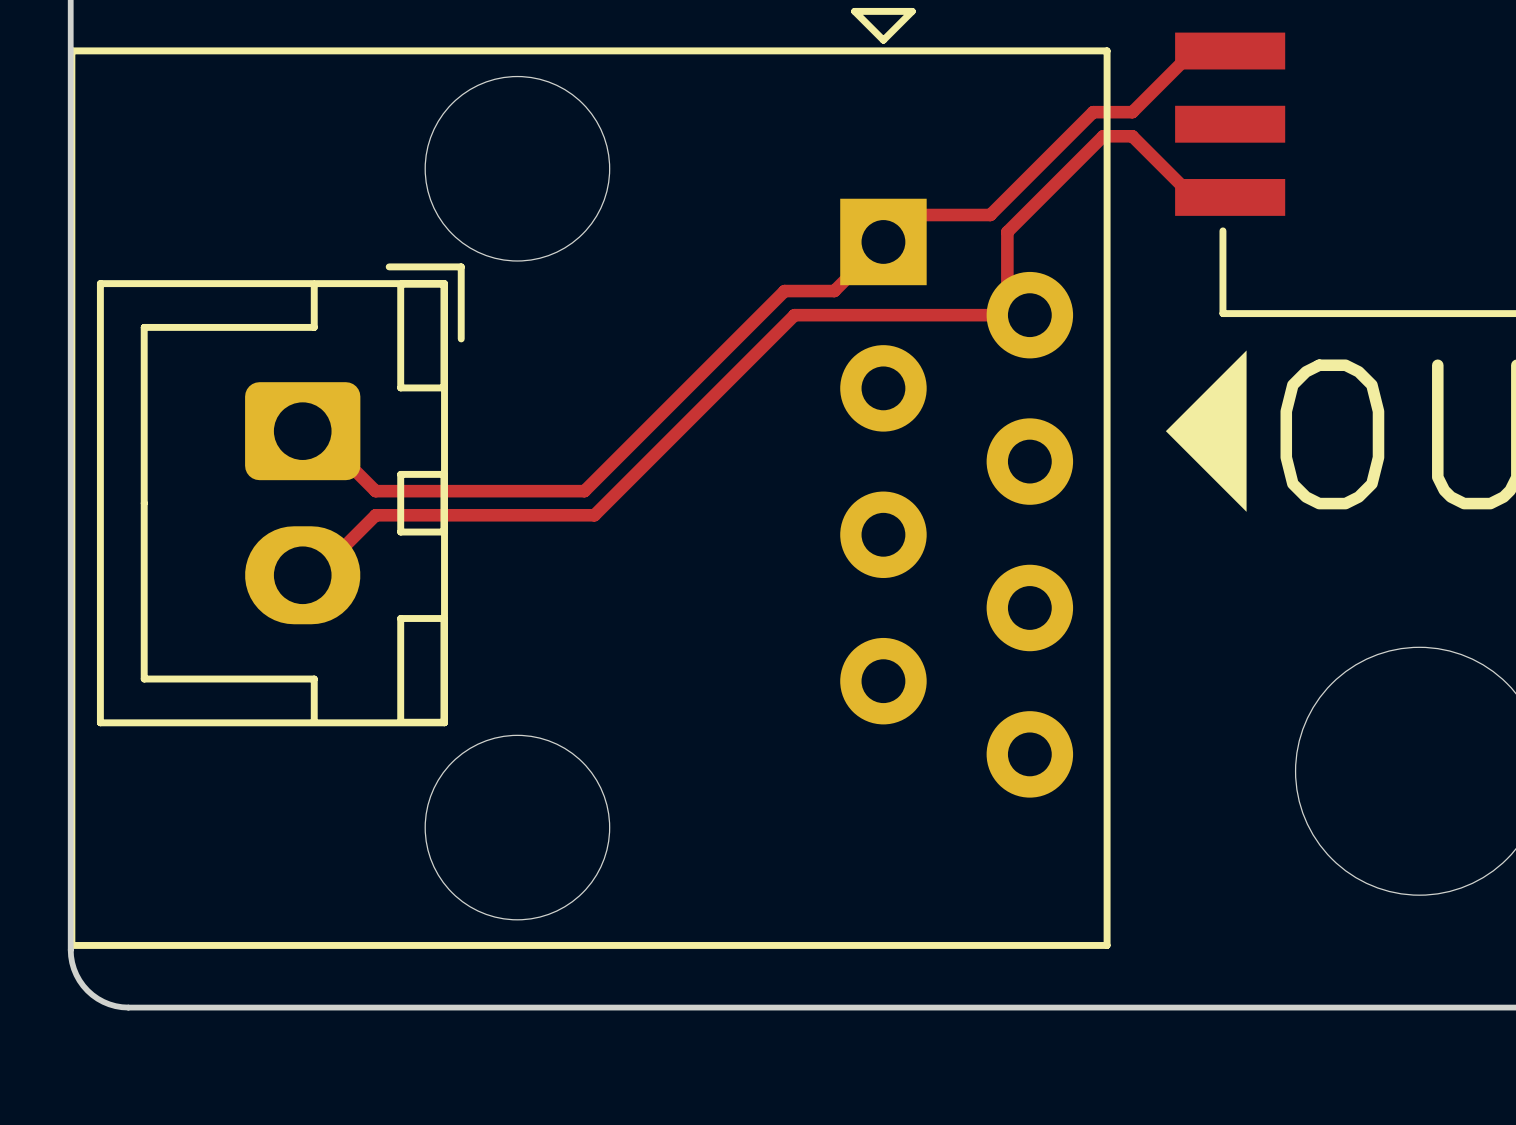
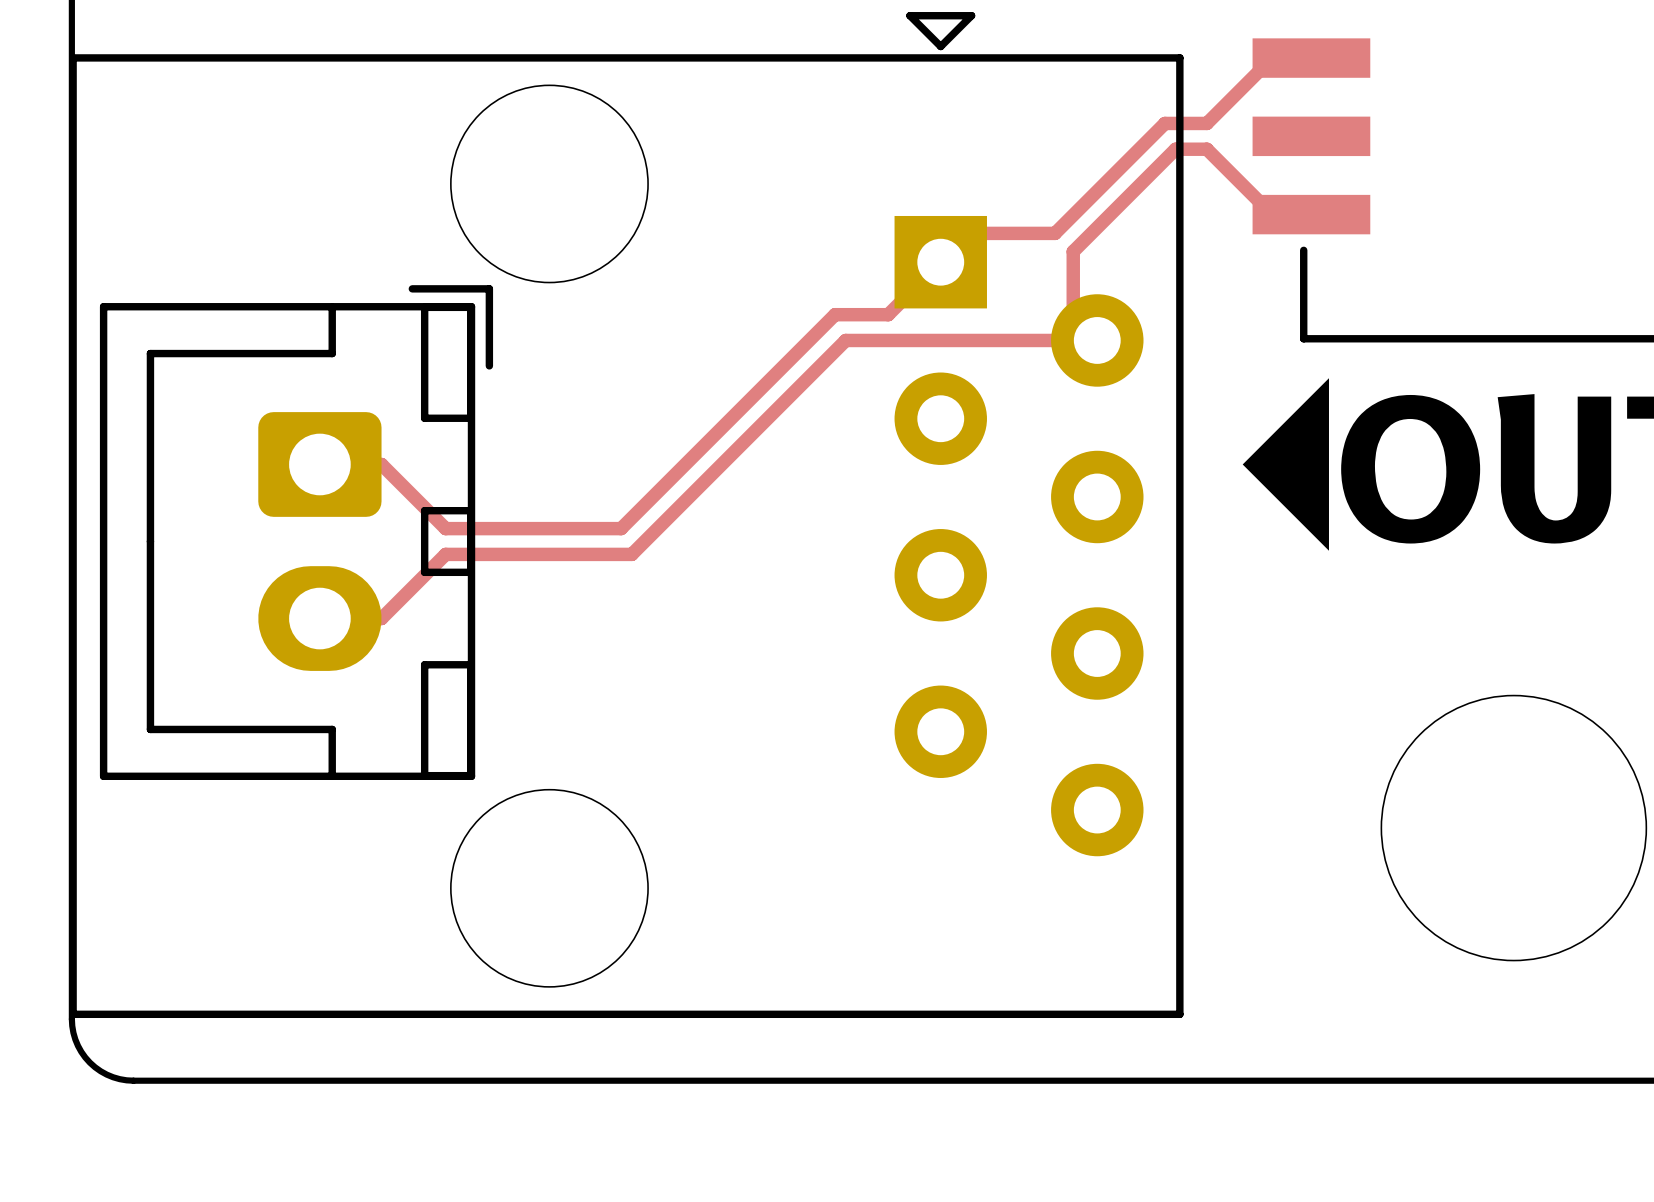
track: (315, 431) (375, 491) (420, 491) -> (333, 464) (381, 464) (445, 528)
track: (420, 515) (375, 515) (315, 575) -> (445, 554) (381, 618) (333, 618)

